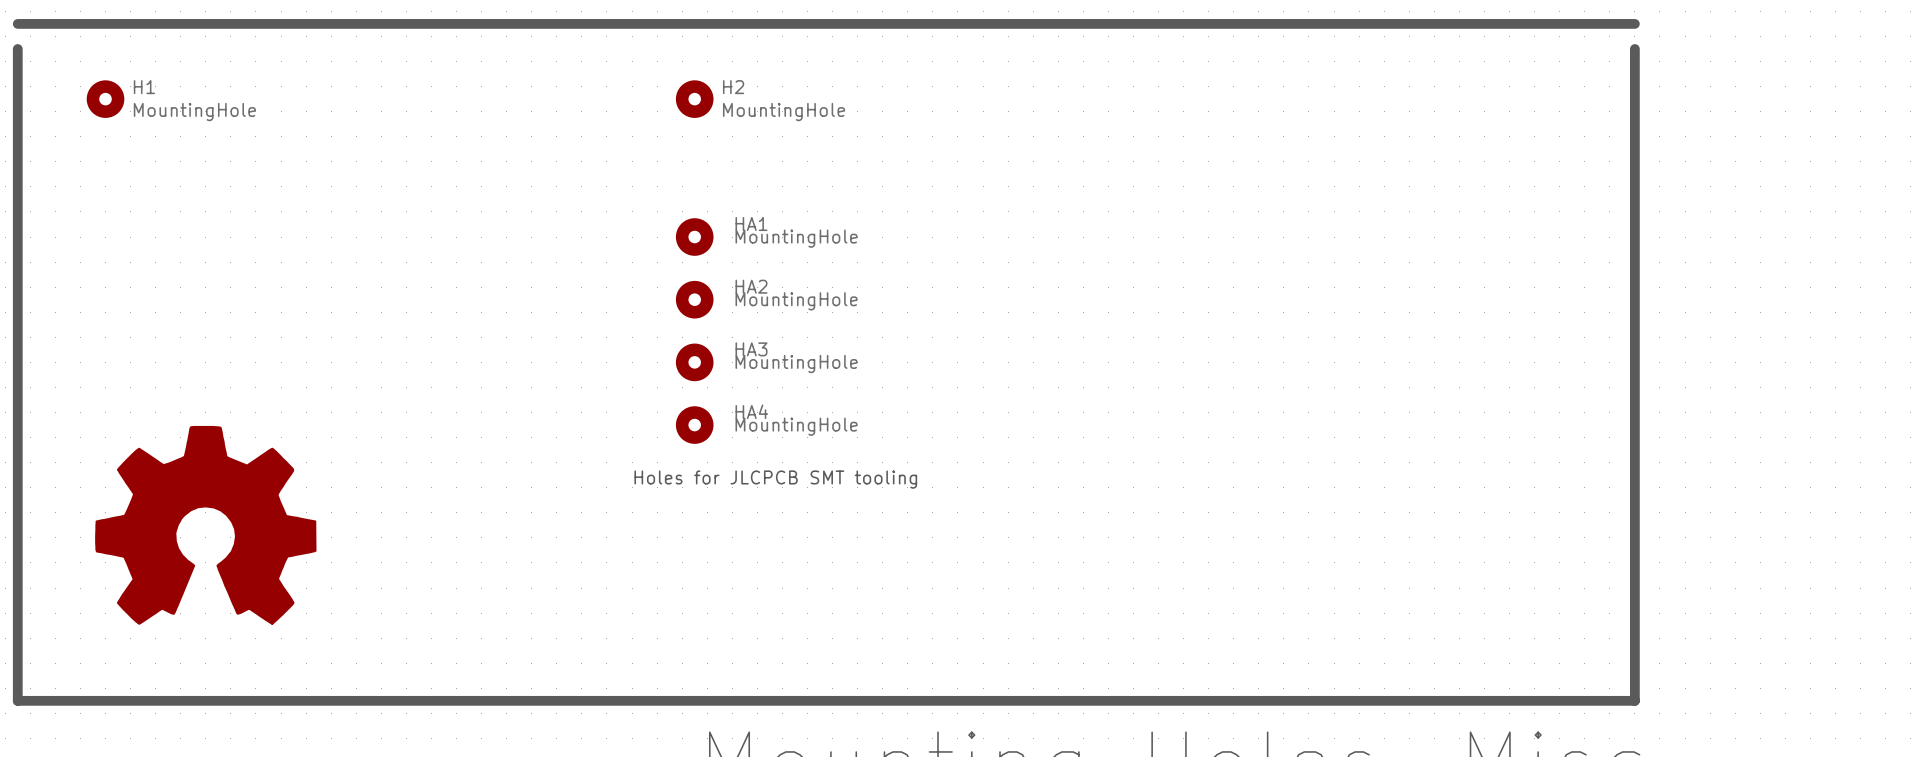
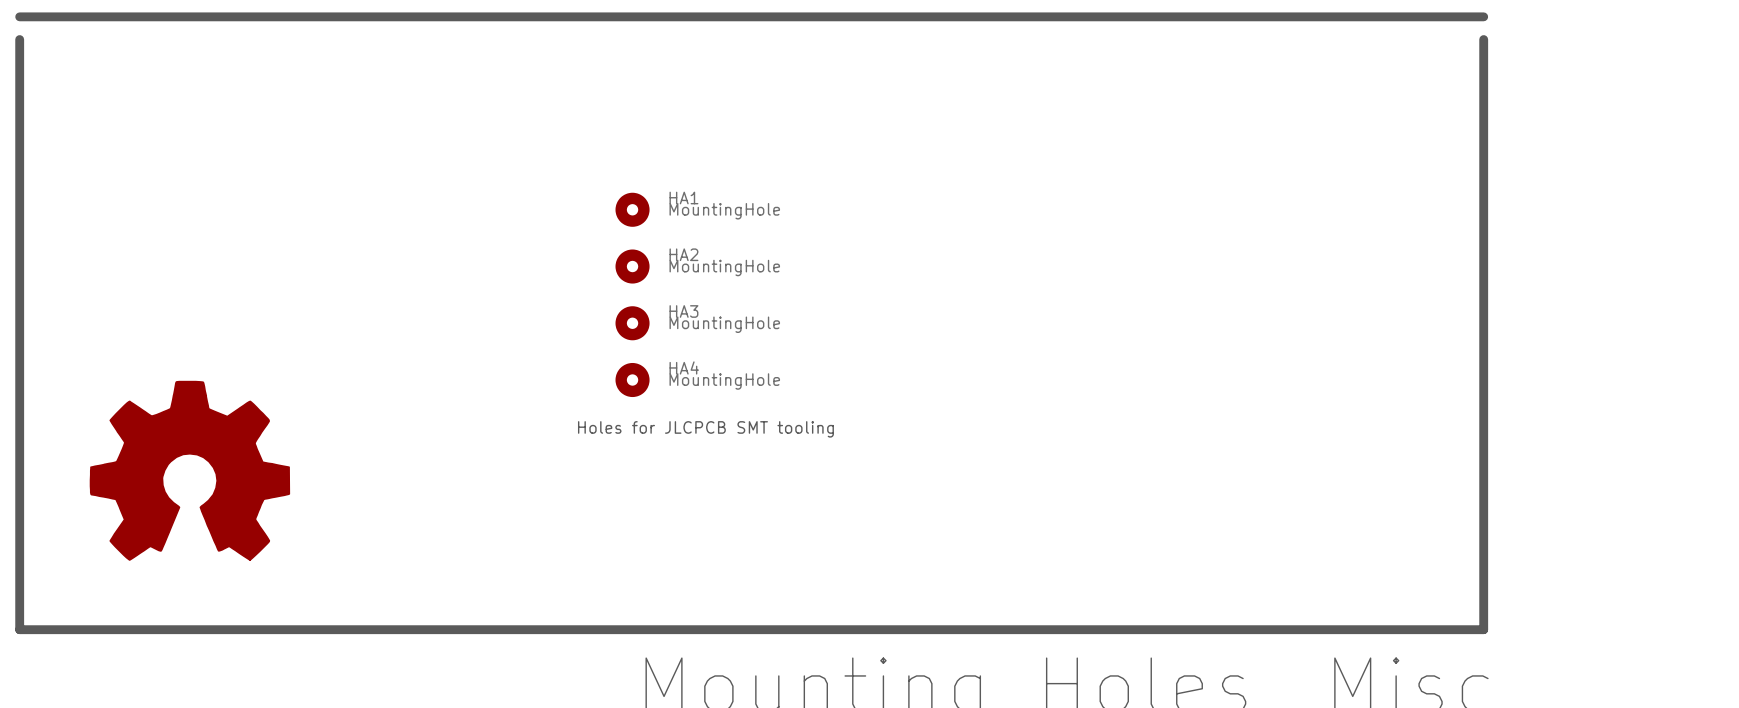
H1: MountingHole (105, 99) -> none
H2: MountingHole (694, 99) -> none

